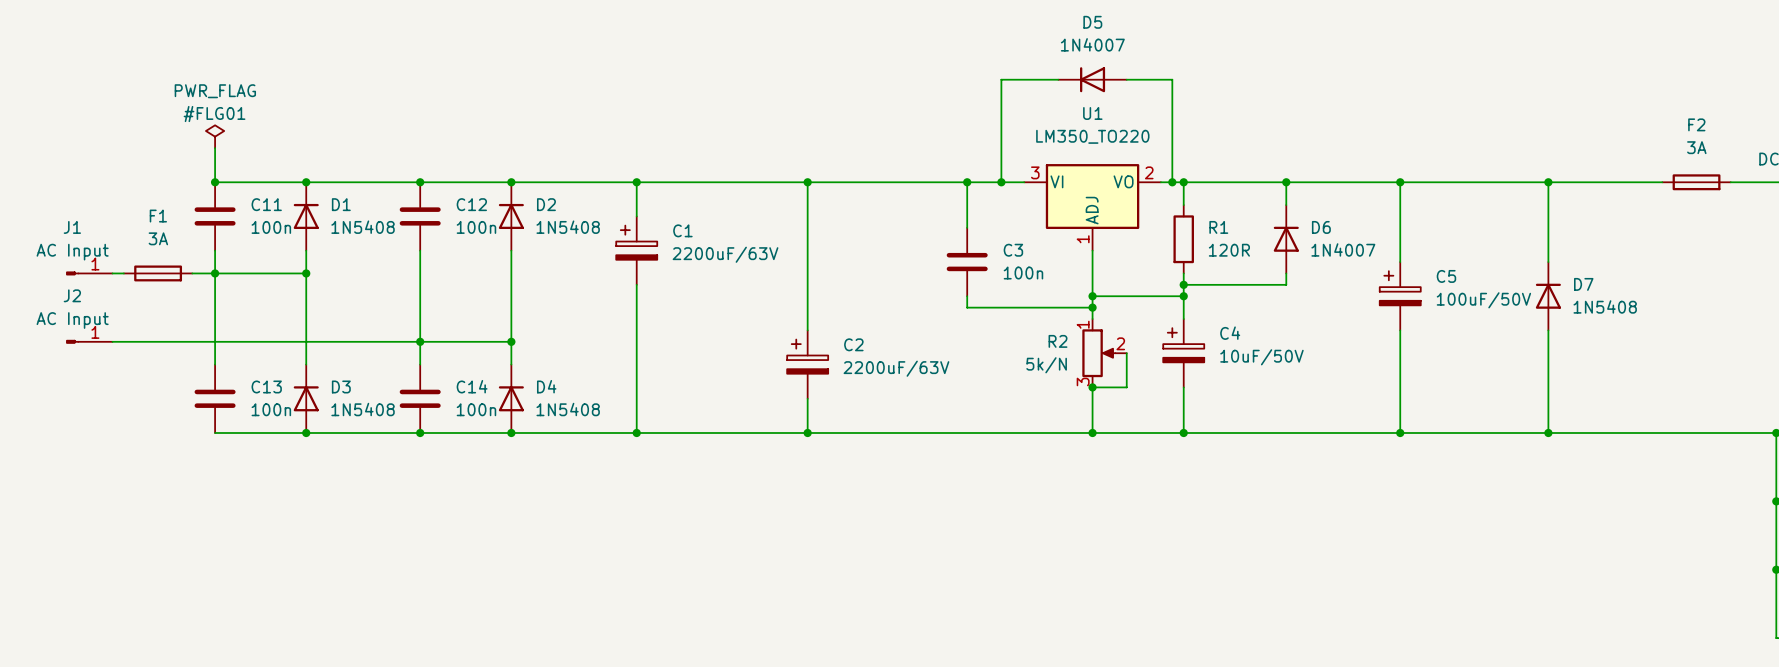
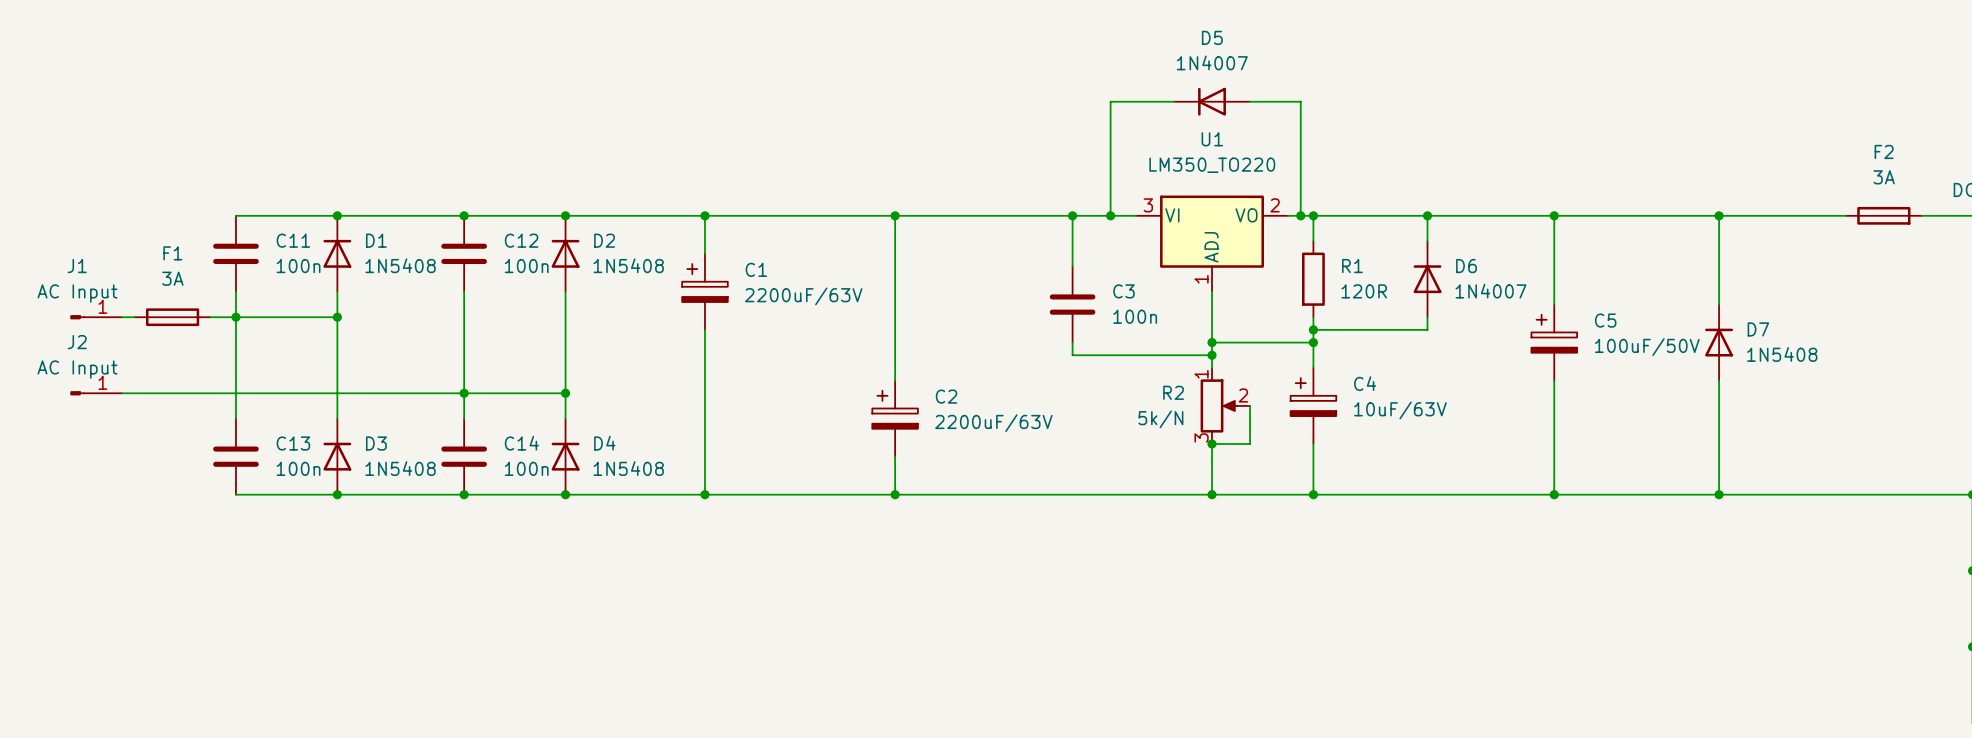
#FLG01: PWR_FLAG (215, 136) -> none
wire: (215, 148) (215, 182) -> none
junction: (215, 182) -> none
C4 value: 10uF/50V (1261, 357) -> 10uF/63V (1400, 410)

